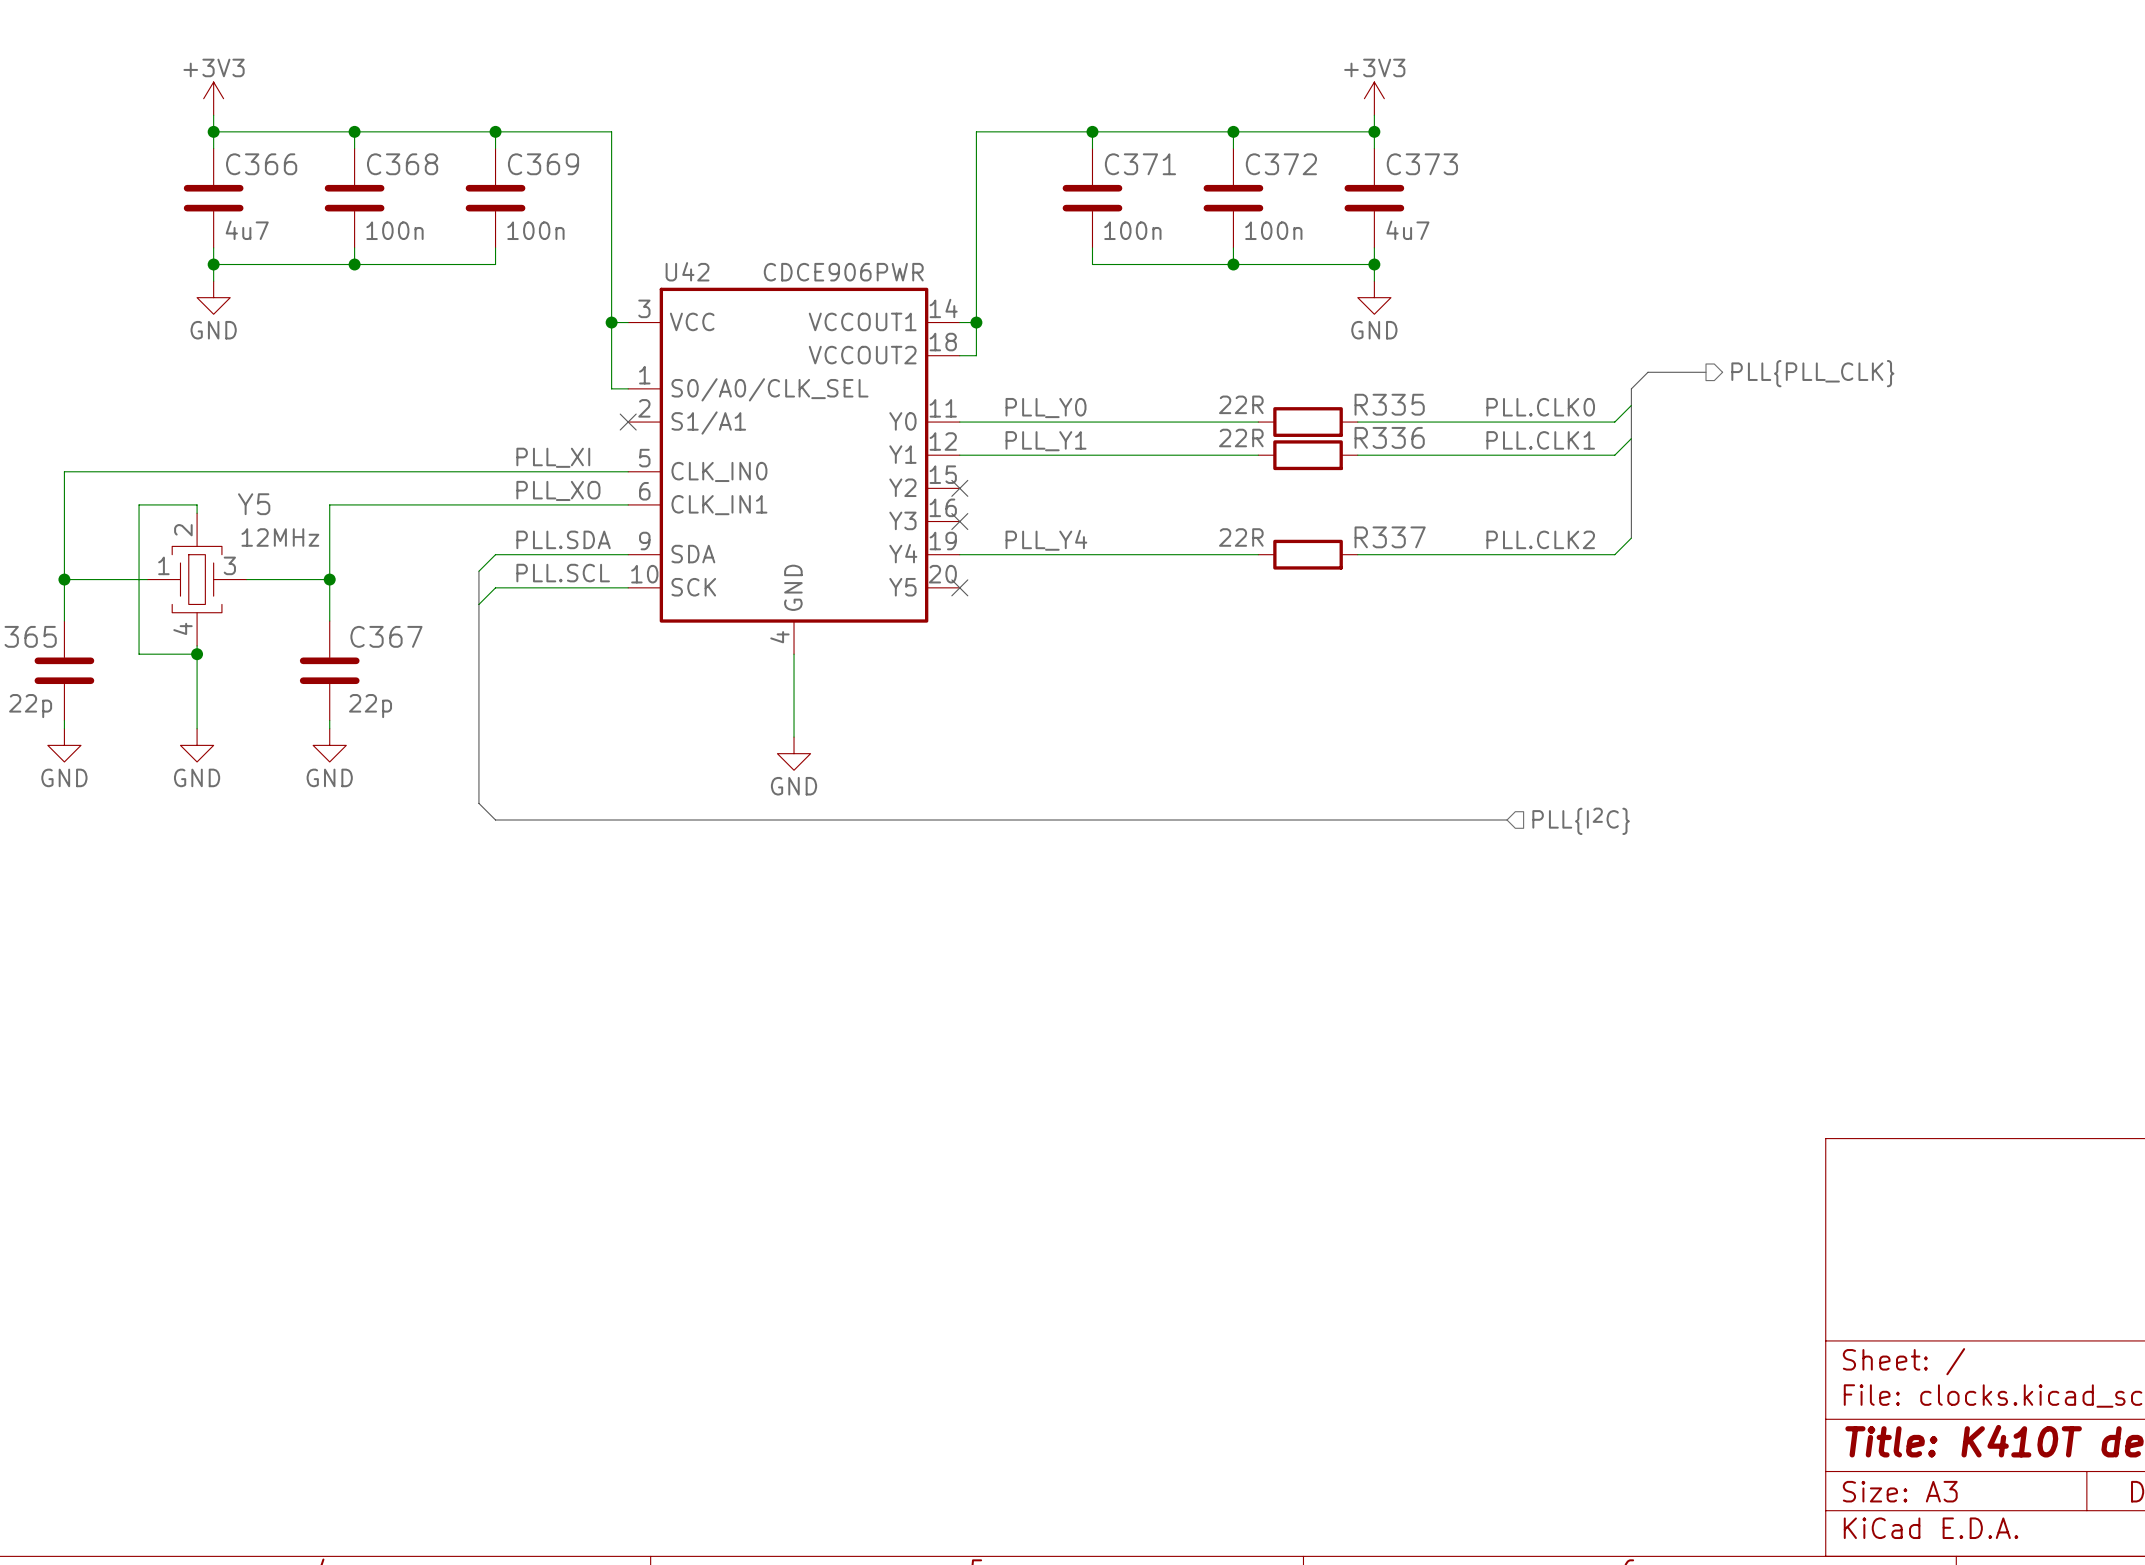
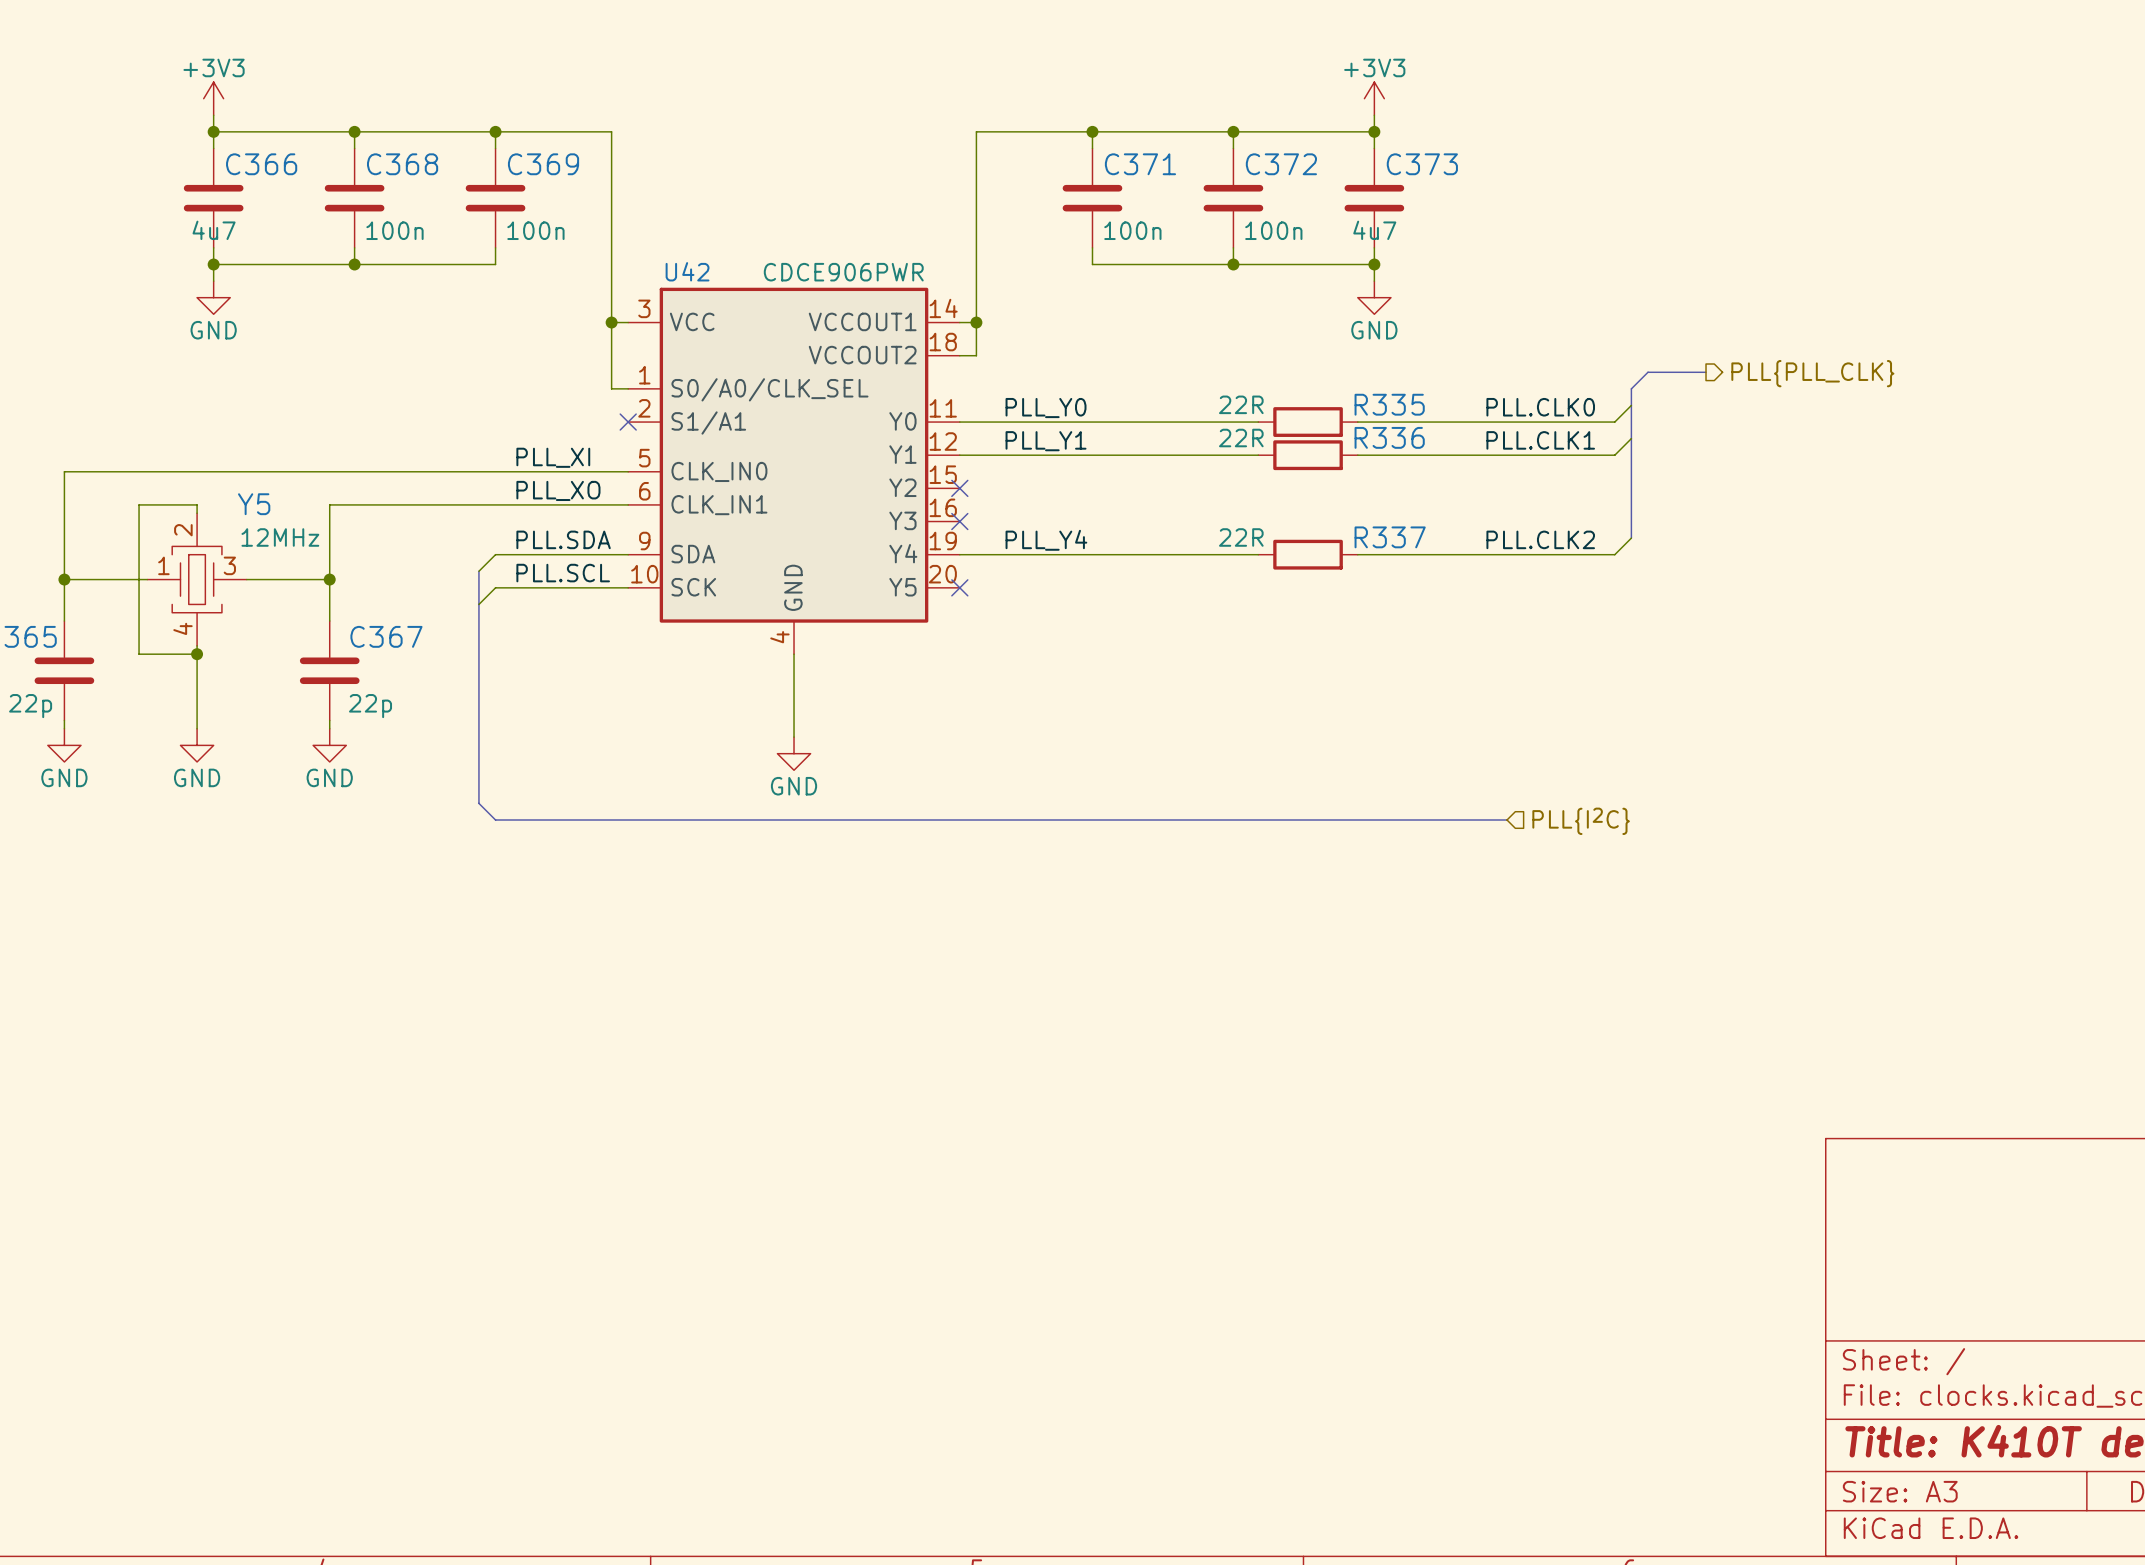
C366 text position: 4u7 (247, 230) -> 4u7 (214, 230)
C373 text position: 4u7 (1407, 230) -> 4u7 (1374, 230)

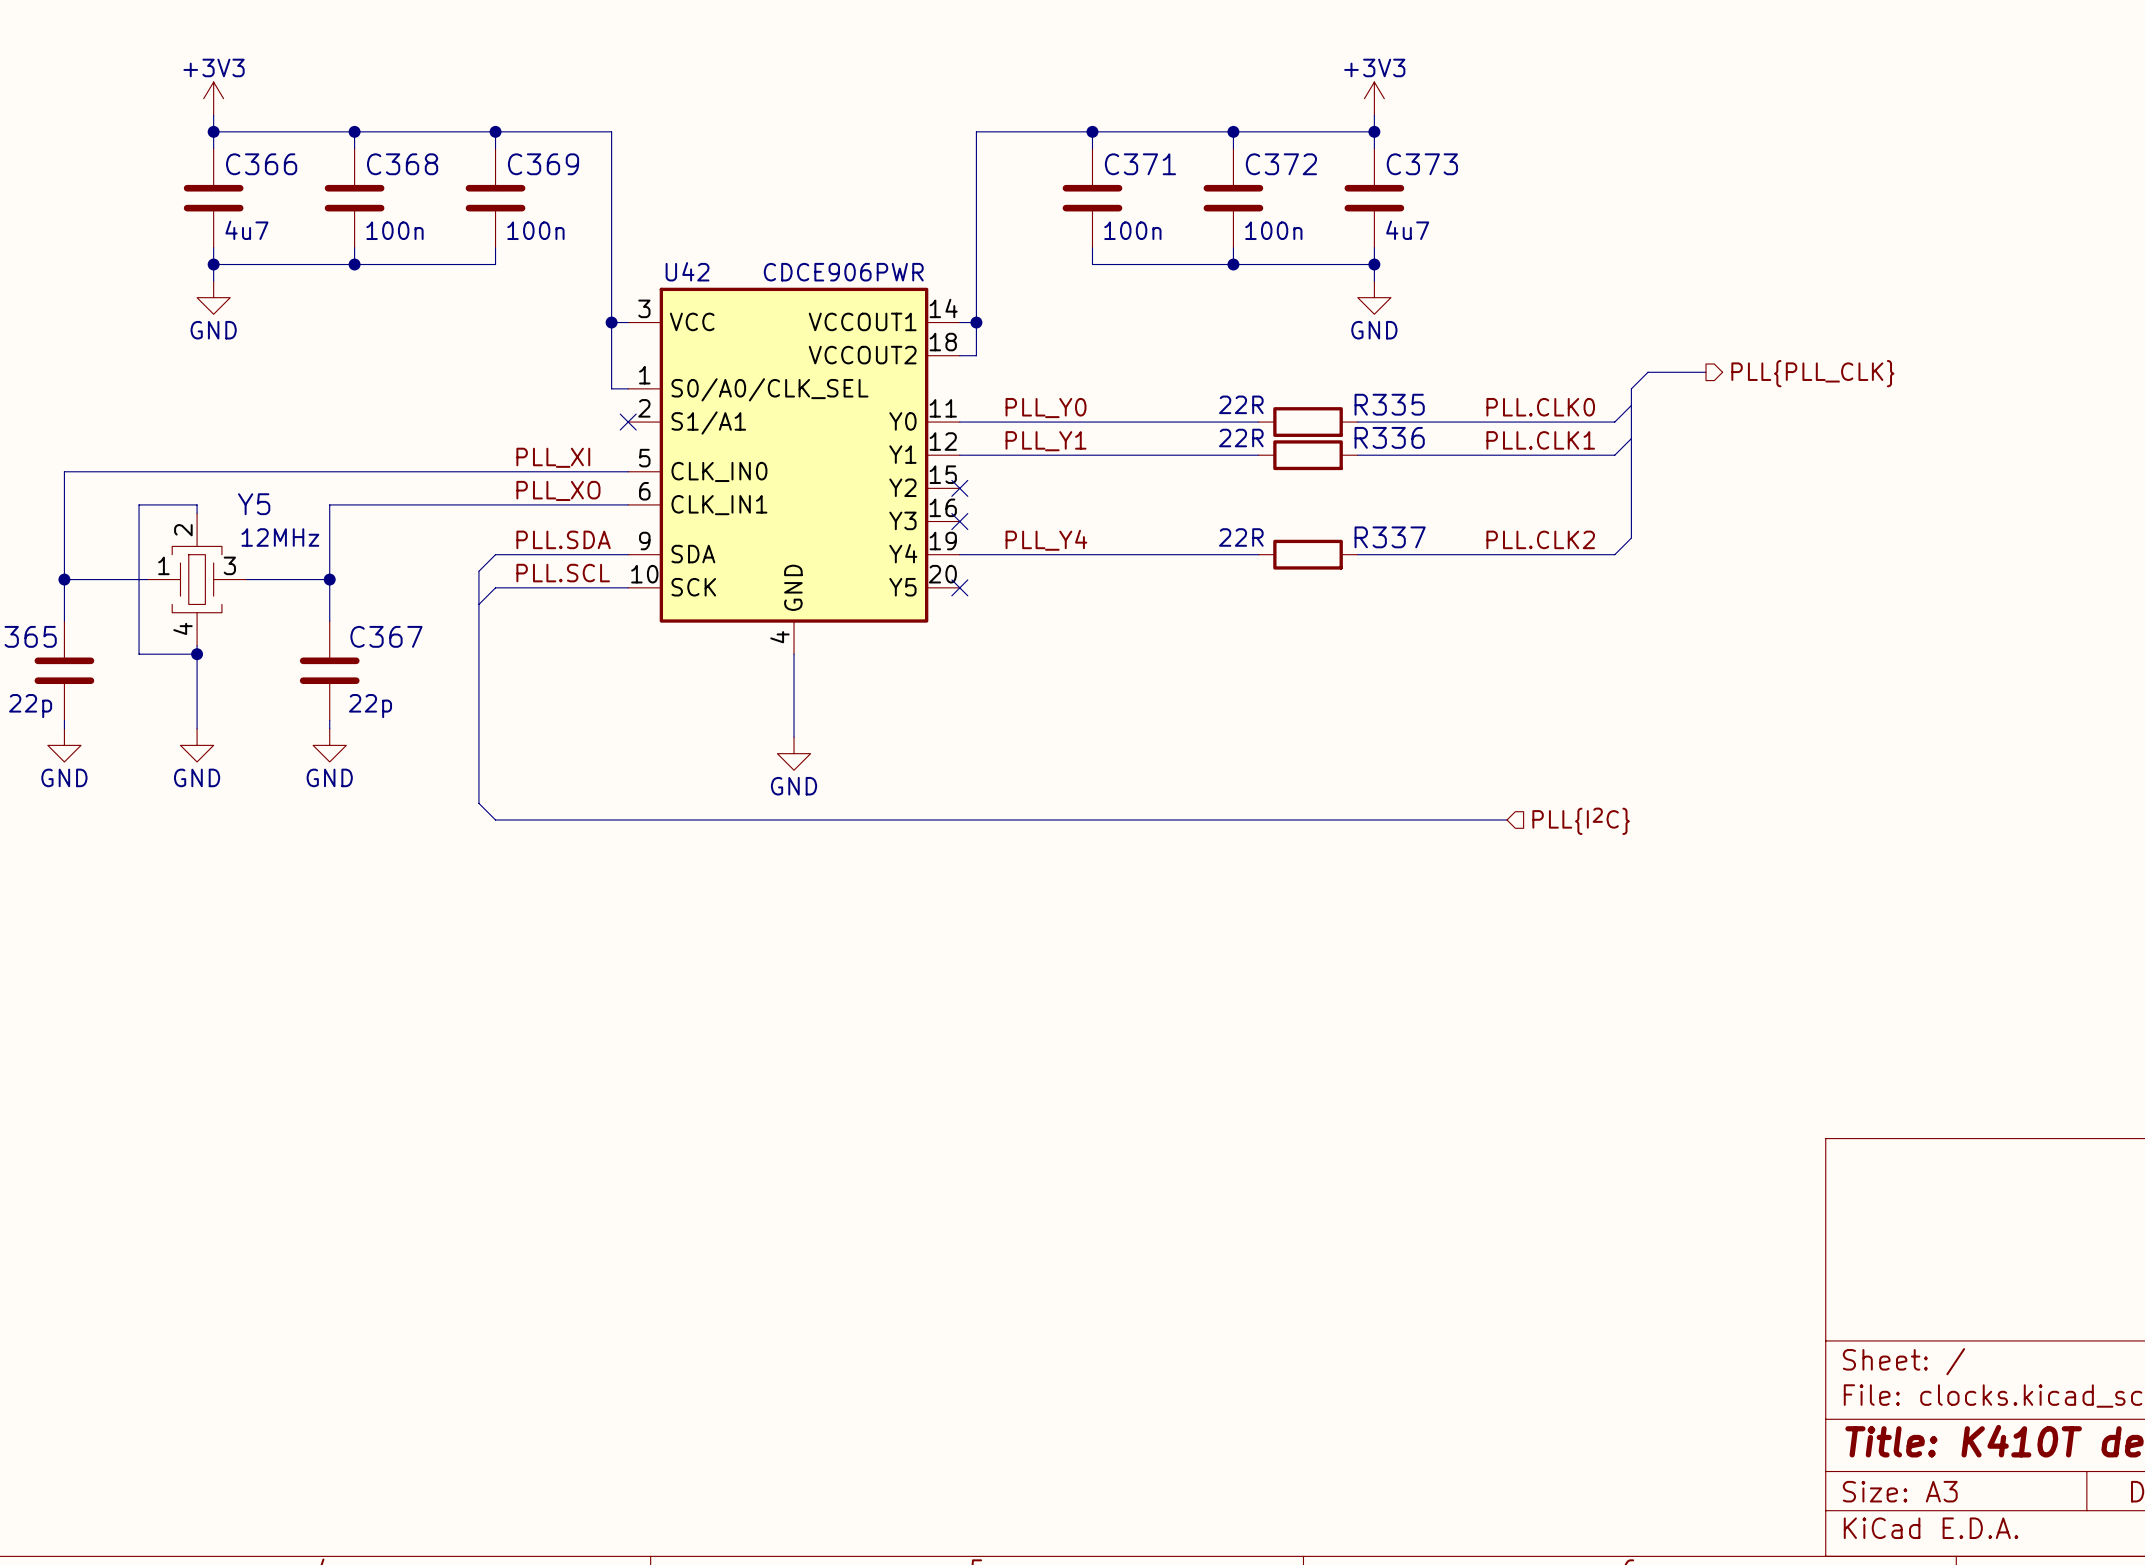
C366 text position: 4u7 (214, 230) -> 4u7 (246, 230)
C373 text position: 4u7 (1374, 230) -> 4u7 (1407, 230)

